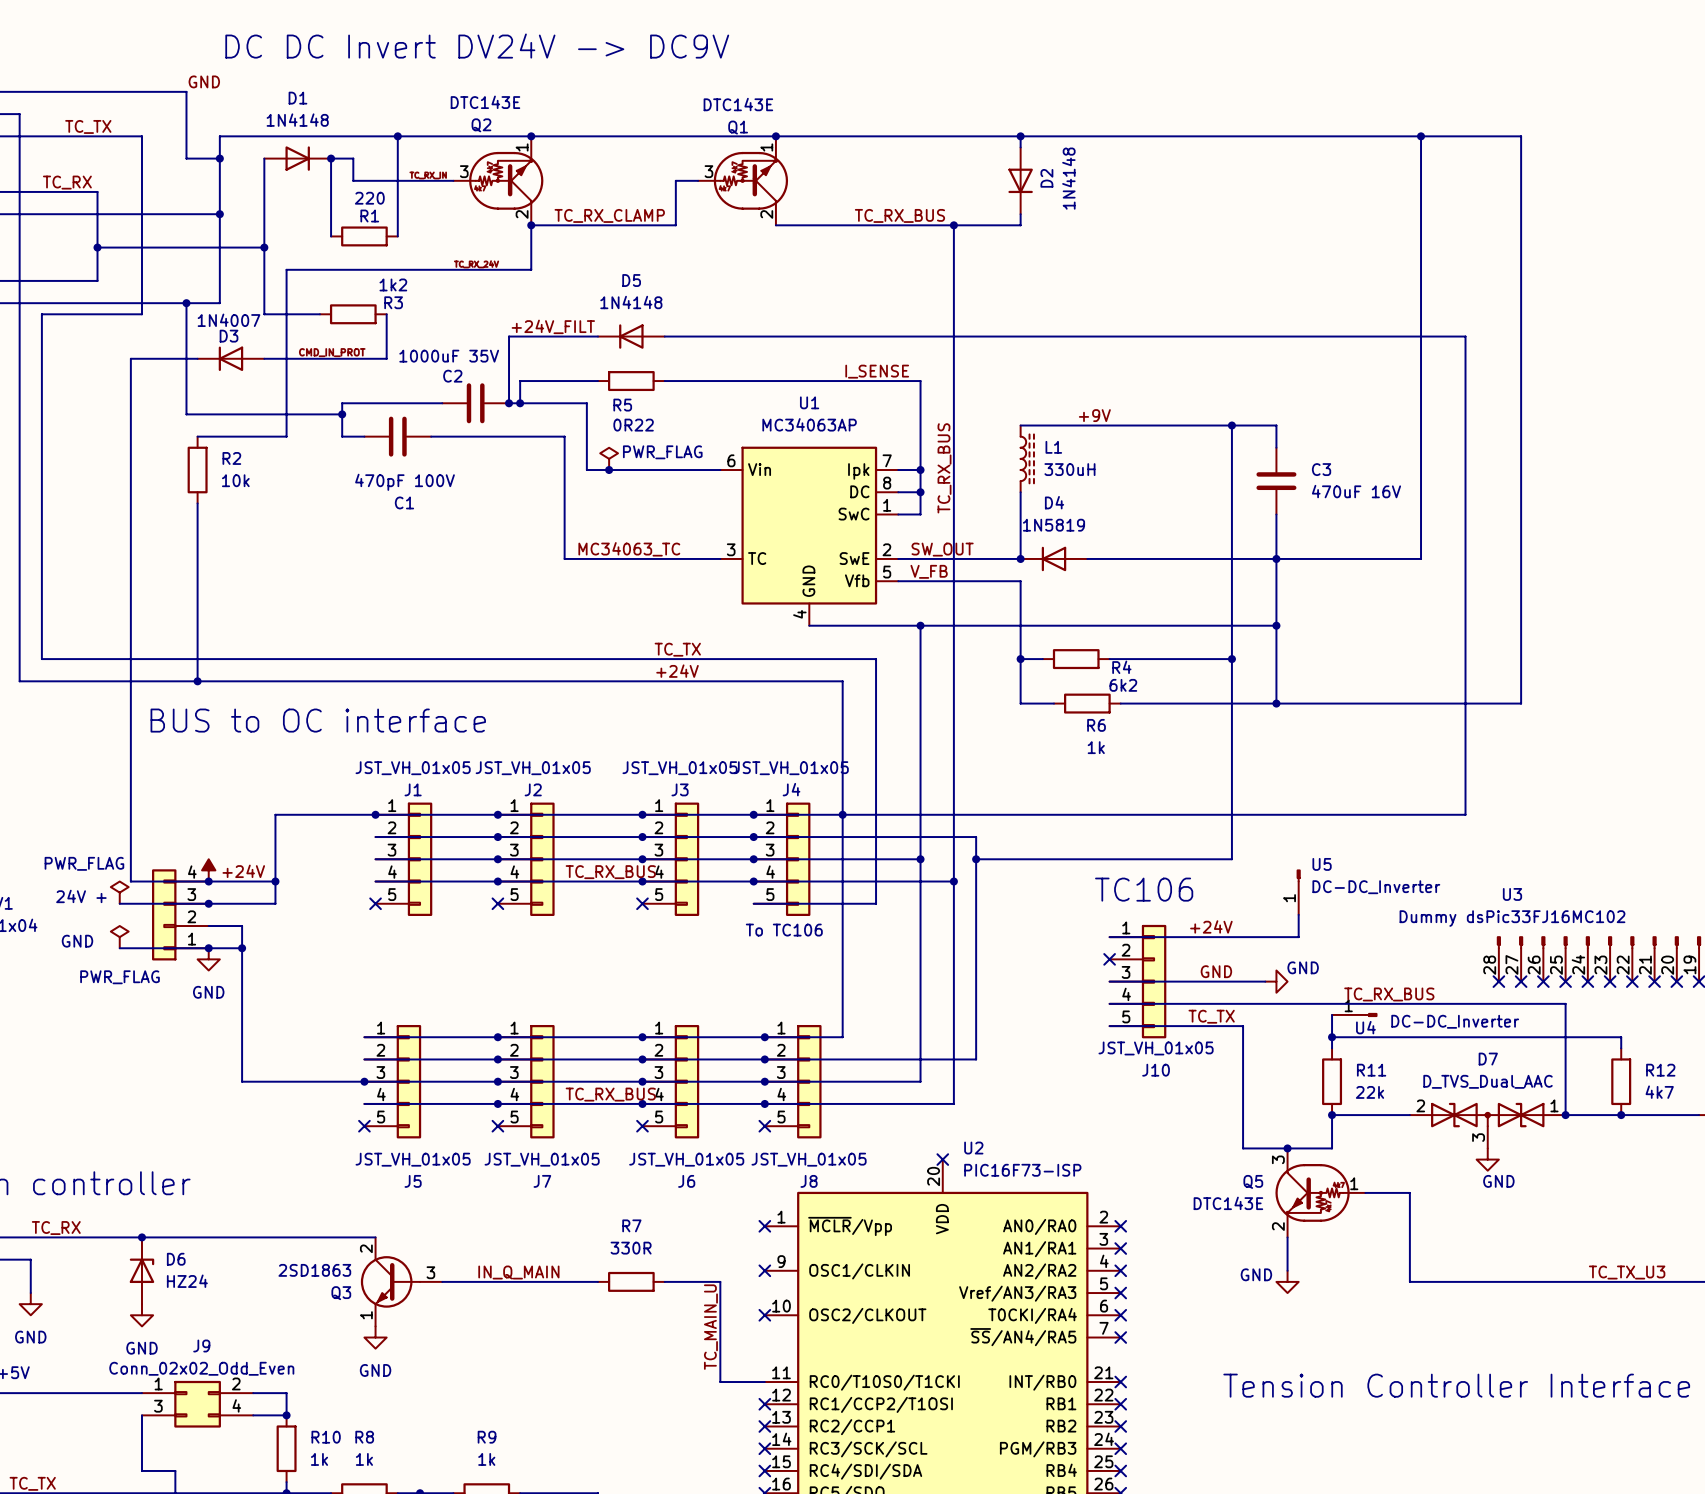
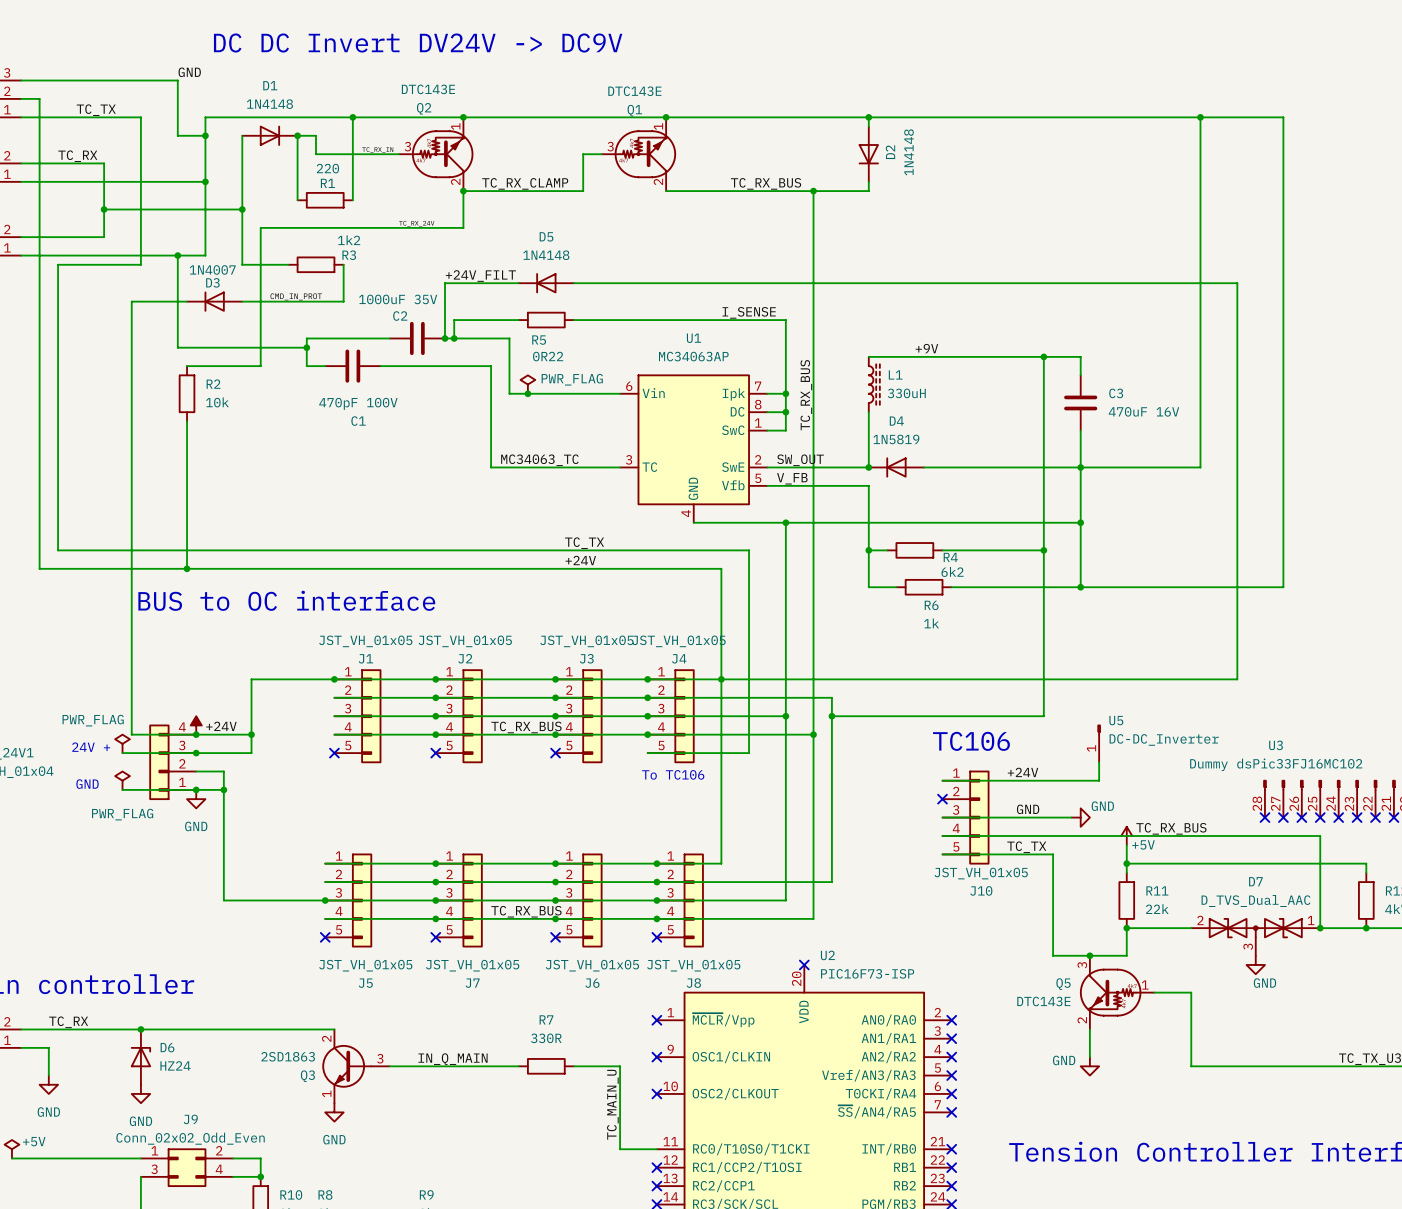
power symbol: none -> +5V (1126, 836)
U4: DC-DC_Inverter (1354, 1014) -> none

